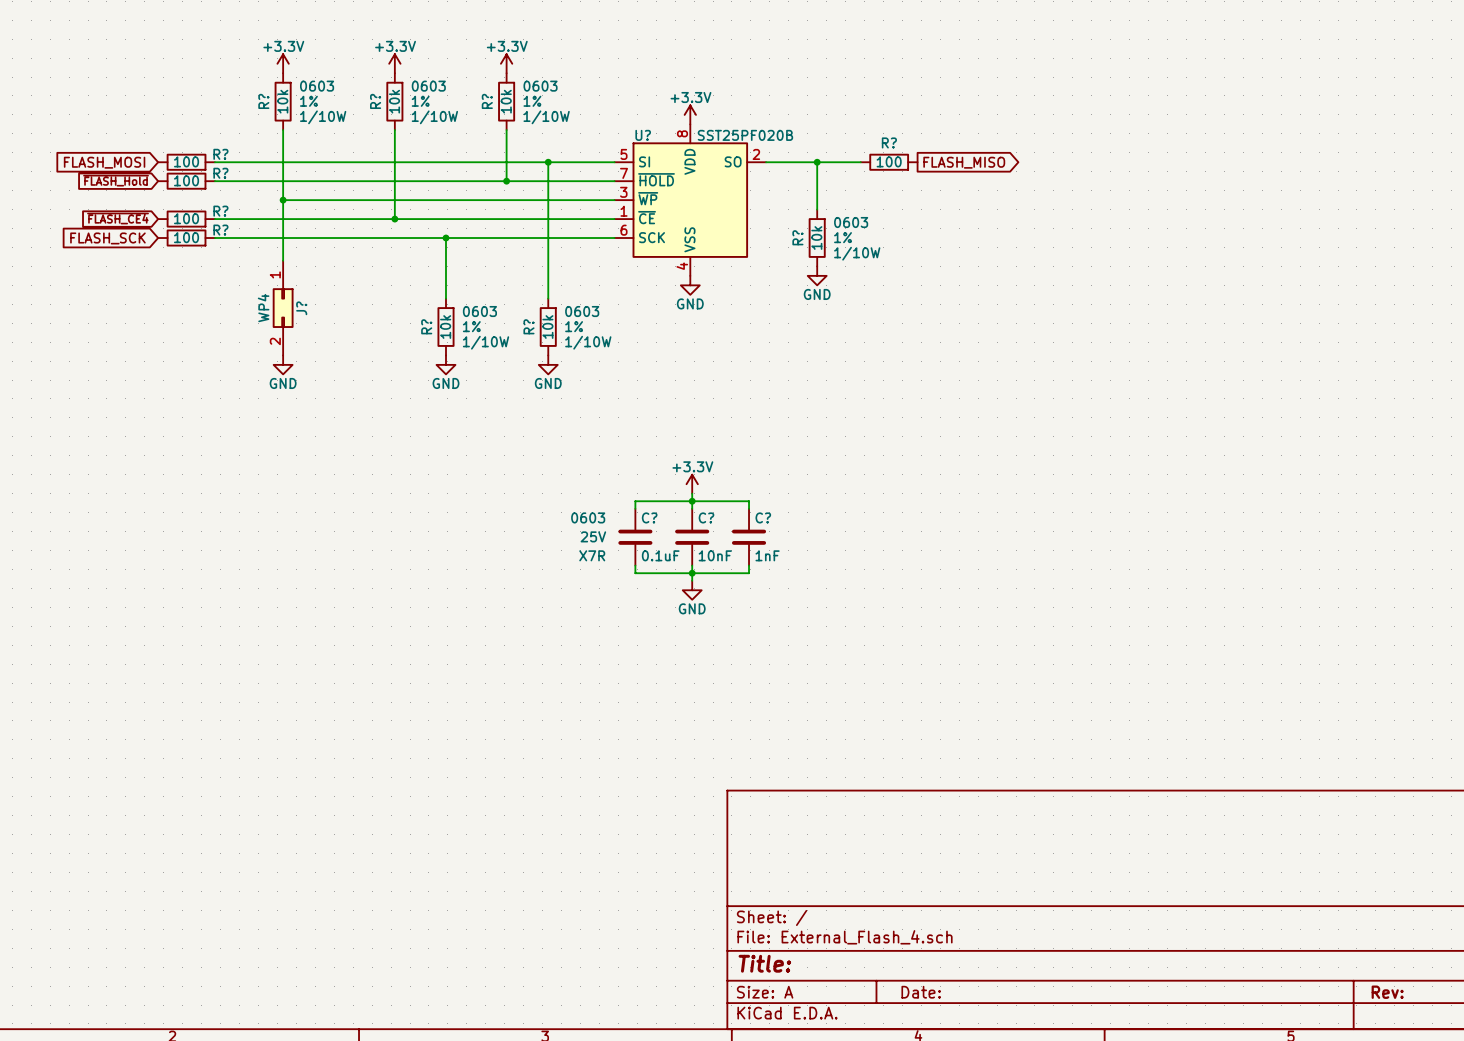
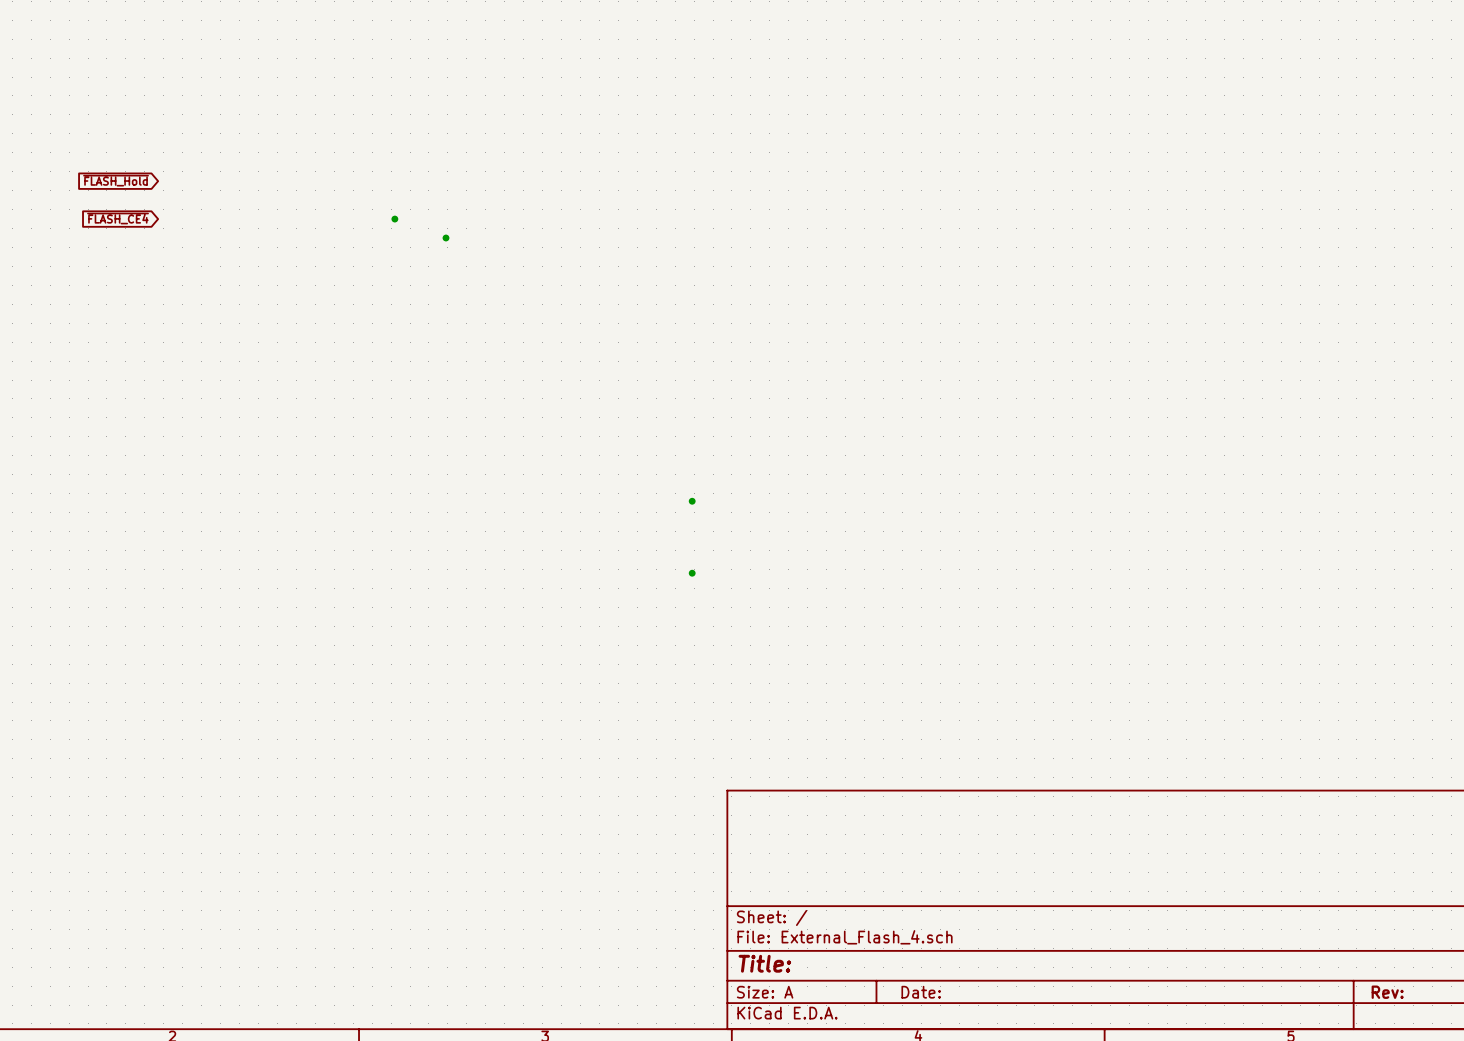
power symbol: +3.3V (283, 63) -> none
power symbol: +3.3V (394, 63) -> none
power symbol: +3.3V (506, 63) -> none
R?: 10k (283, 101) -> none
R?: 10k (394, 101) -> none
R?: 10k (506, 101) -> none
power symbol: +3.3V (690, 114) -> none
wire: (283, 130) (283, 260) -> none
wire: (394, 130) (394, 219) -> none
wire: (506, 130) (506, 181) -> none
global label: FLASH_MOSI (104, 162) -> none
R?: 100 (186, 162) -> none
wire: (214, 162) (614, 162) -> none
wire: (548, 162) (548, 298) -> none
junction: (548, 162) -> none
wire: (766, 162) (860, 162) -> none
wire: (817, 162) (817, 209) -> none
junction: (817, 162) -> none
R?: 100 (889, 162) -> none
global label: FLASH_MISO (964, 162) -> none
R?: 100 (186, 181) -> none
wire: (214, 181) (614, 181) -> none
junction: (506, 181) -> none
wire: (283, 200) (614, 200) -> none
junction: (283, 200) -> none
U?: SST25PF020B (690, 200) -> none
R?: 100 (186, 219) -> none
wire: (214, 219) (614, 219) -> none
global label: FLASH_SCK (107, 238) -> none
R?: 100 (186, 238) -> none
wire: (214, 238) (614, 238) -> none
wire: (446, 238) (446, 298) -> none
R?: 10k (817, 238) -> none
power symbol: GND (817, 275) -> none
power symbol: GND (690, 285) -> none
J?: WP4 (283, 308) -> none
R?: 10k (446, 327) -> none
R?: 10k (548, 327) -> none
power symbol: GND (283, 364) -> none
power symbol: GND (446, 364) -> none
power symbol: GND (548, 364) -> none
power symbol: +3.3V (692, 484) -> none
wire: (692, 493) (692, 508) -> none
wire: (635, 508) (635, 501) (749, 501) (749, 508) -> none
C?: 0.1uF (635, 537) -> none
C?: 10nF (692, 537) -> none
C?: 1nF (749, 537) -> none
wire: (635, 565) (635, 573) (749, 573) (749, 565) -> none
wire: (692, 565) (692, 580) -> none
power symbol: GND (692, 590) -> none

